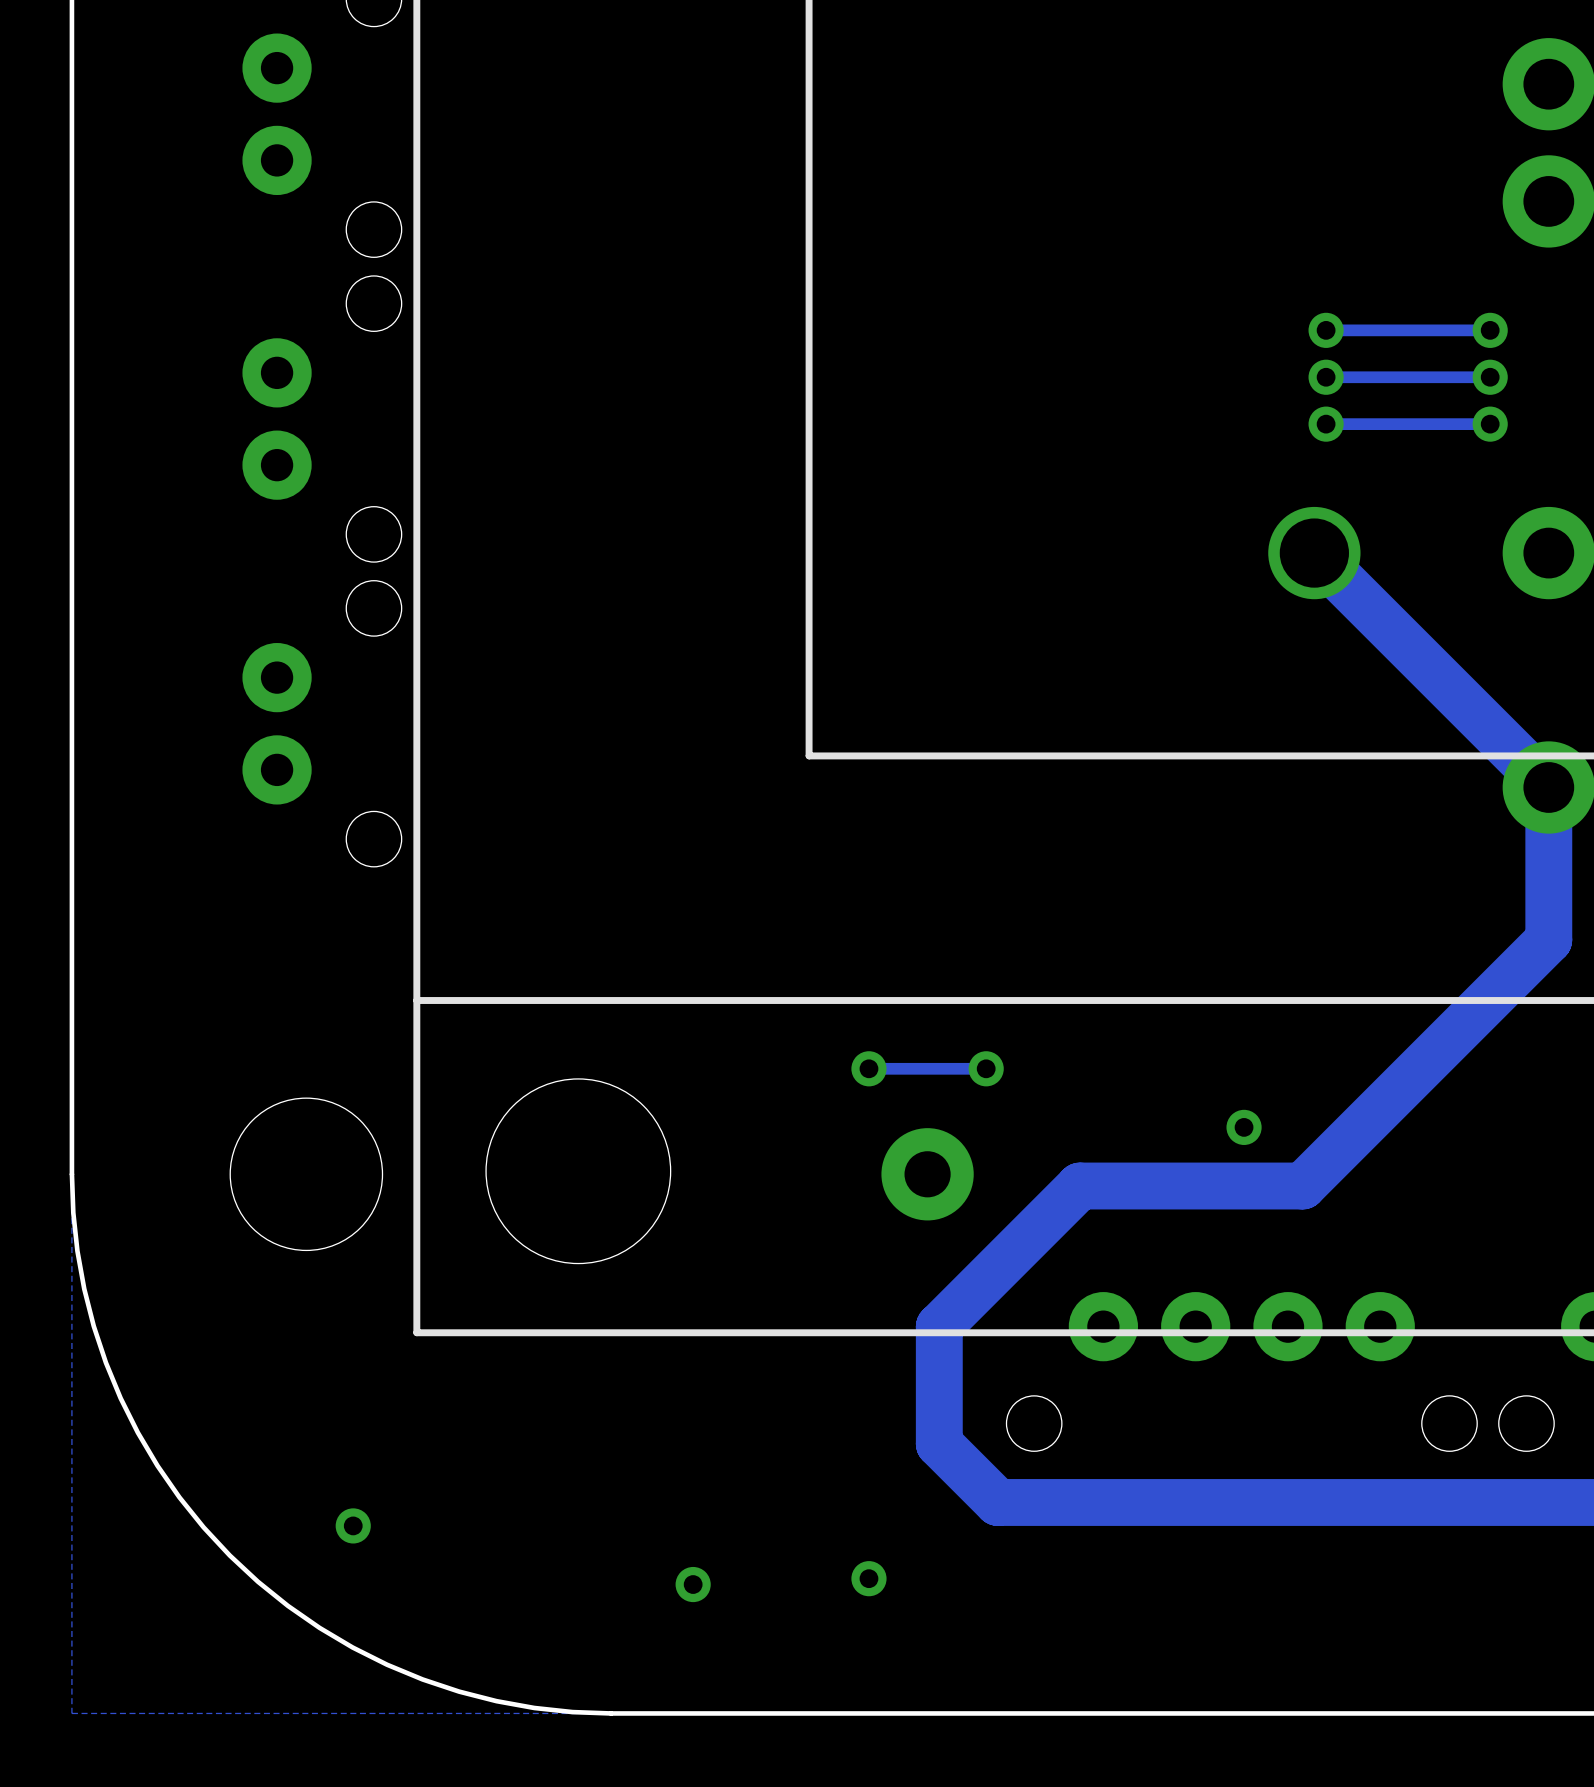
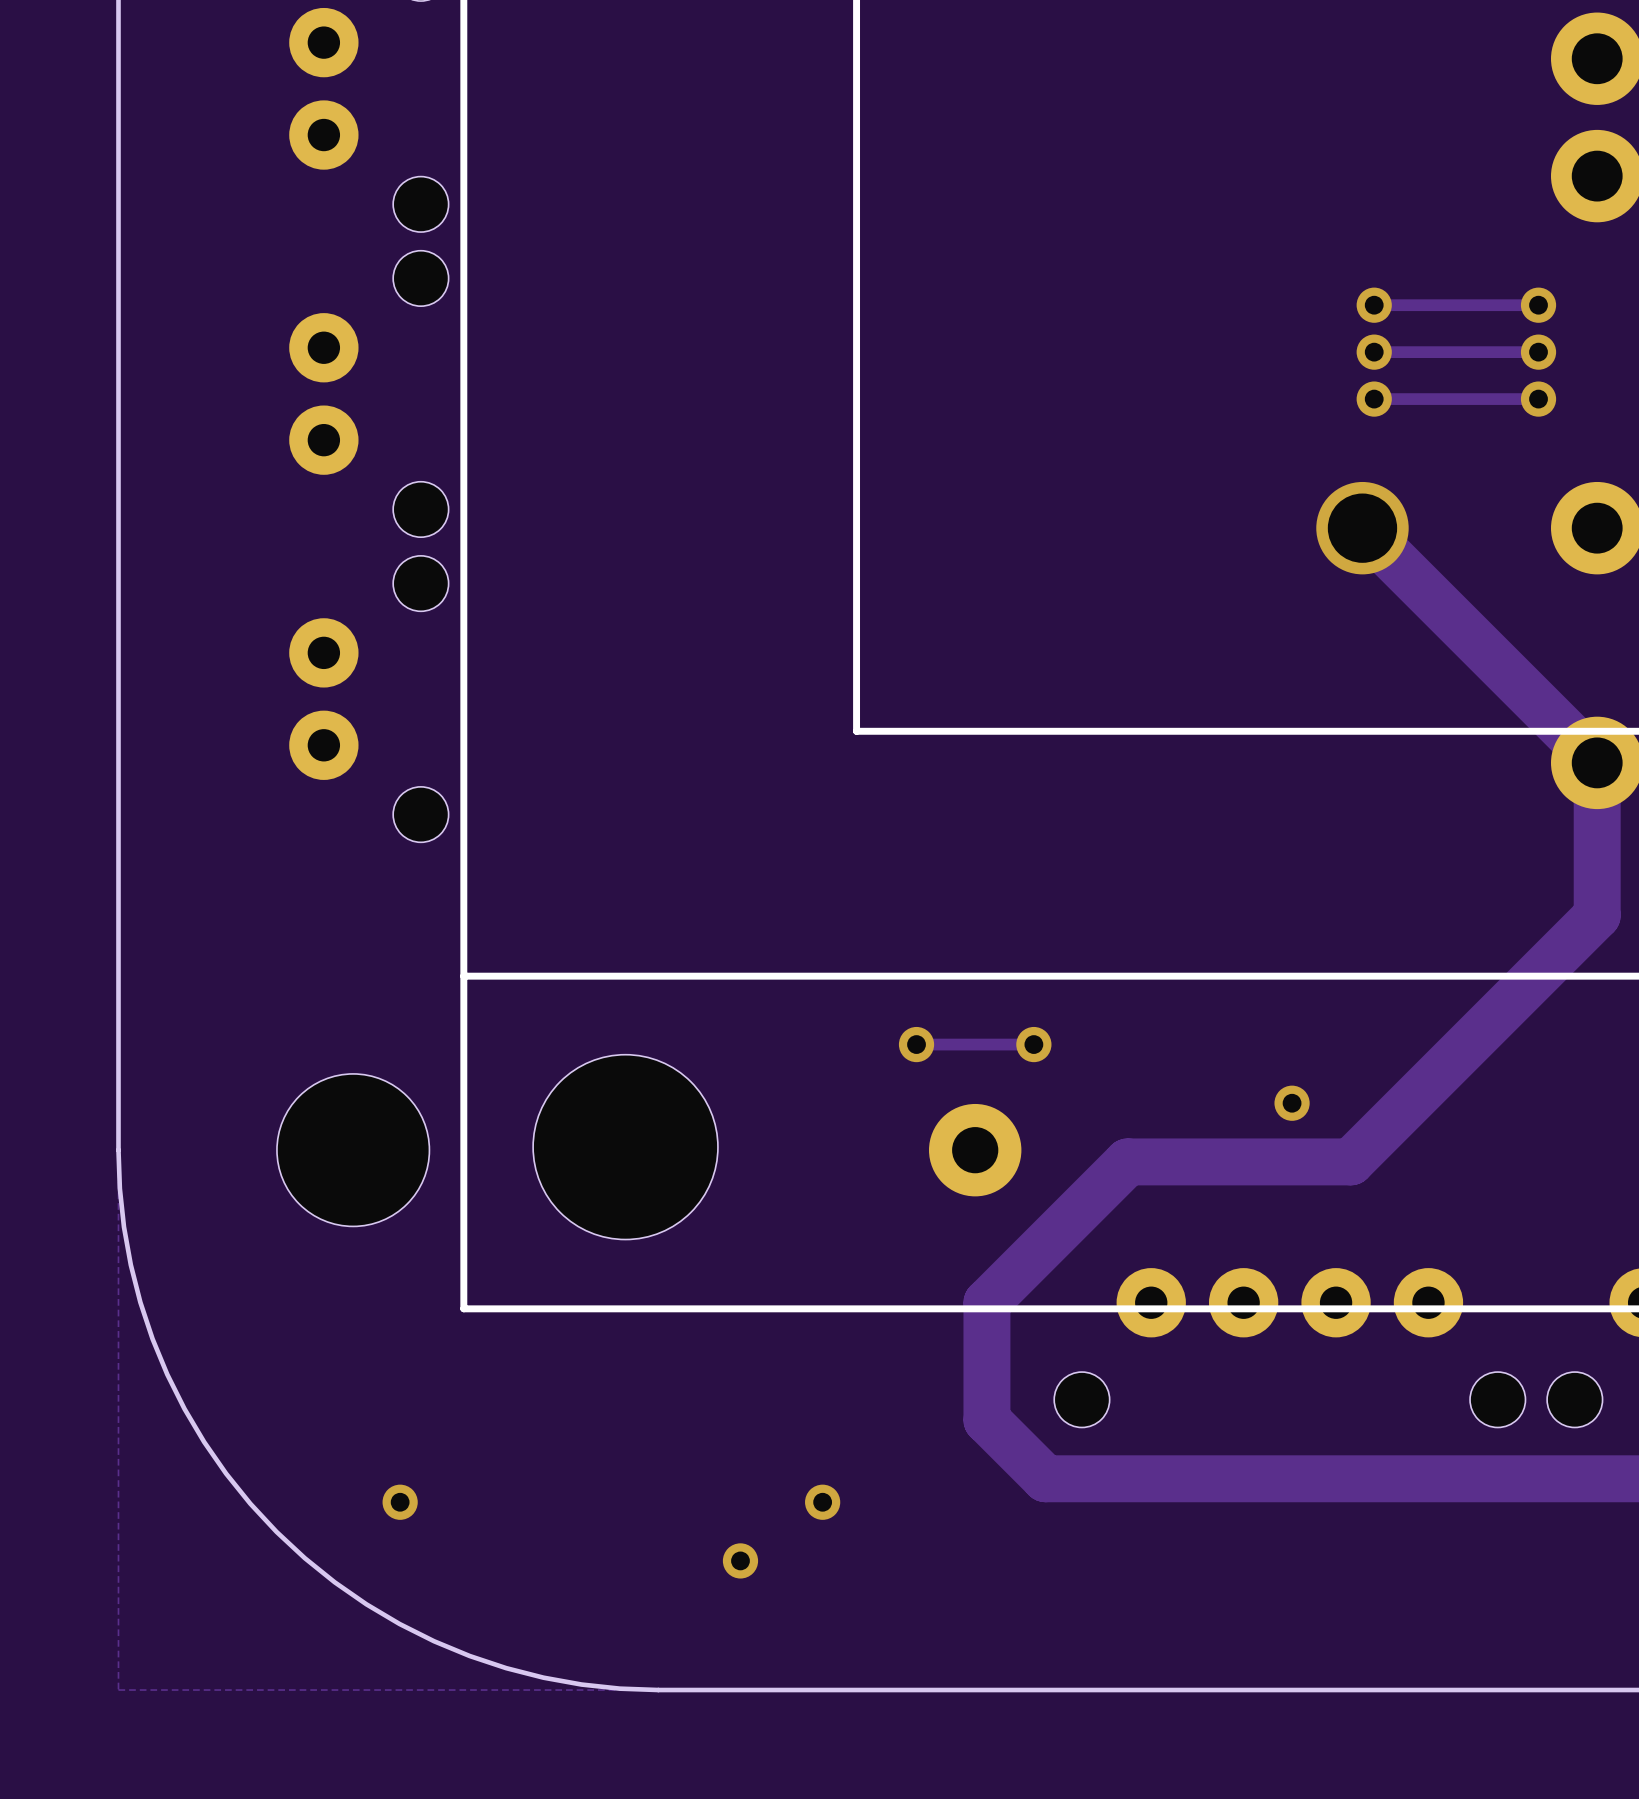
via position: (868, 1578) -> (822, 1502)

